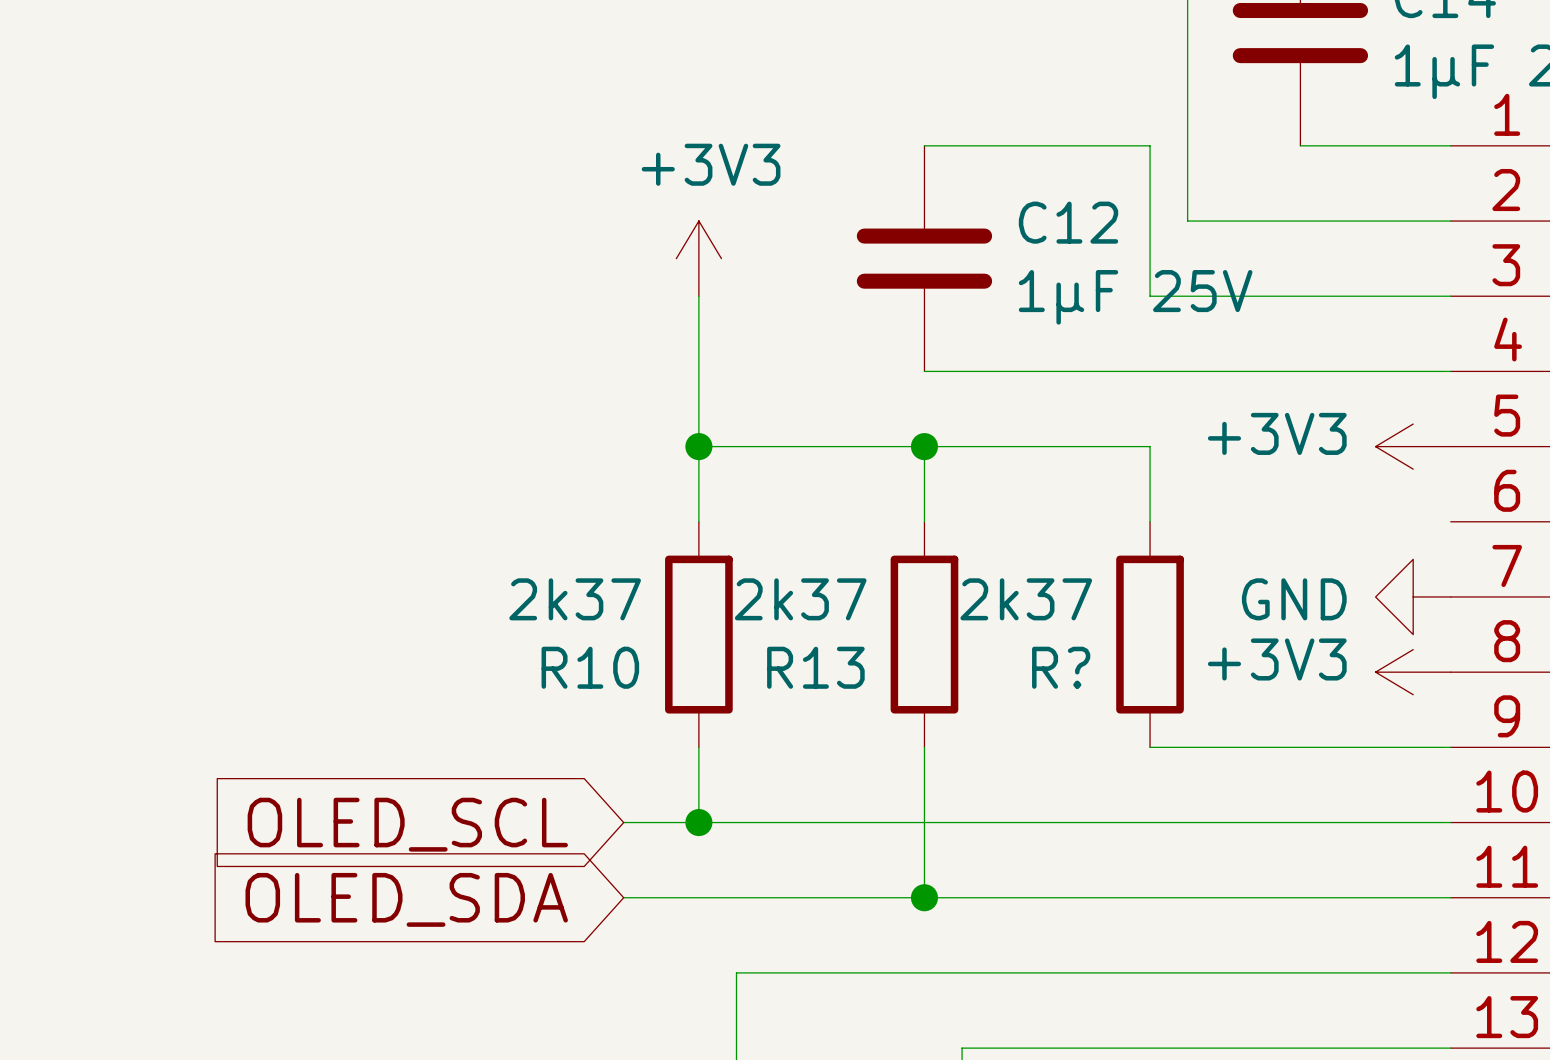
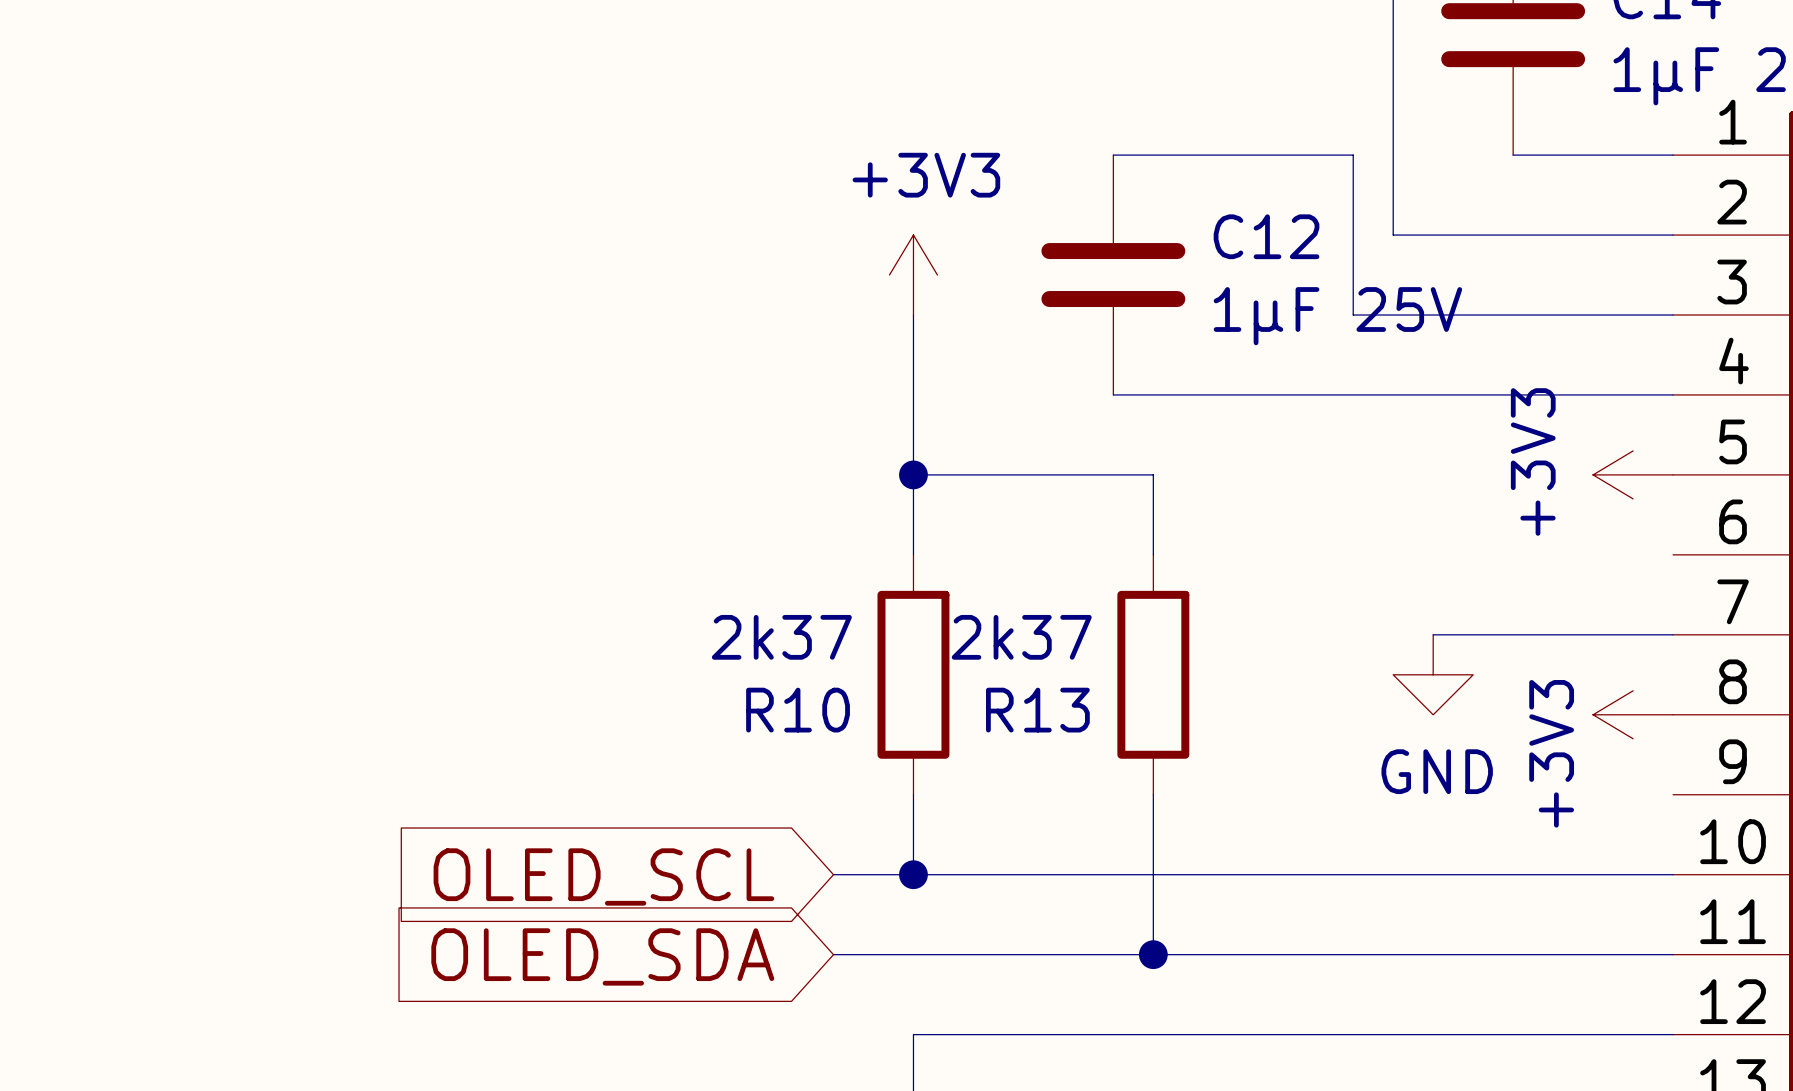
power symbol position: +3V3 (698, 258) -> +3V3 (913, 275)
wire: (698, 296) (698, 521) -> (913, 315) (913, 554)
power symbol text rotation: 0° (1277, 433) -> 90° counterclockwise (1533, 461)
wire: (698, 446) (736, 446) -> none
junction position: (698, 446) -> (913, 474)
wire: (924, 446) (924, 521) -> none
junction: (924, 446) -> none
wire: (962, 446) (1150, 446) (1150, 521) -> (1153, 474) (1153, 554)
wire: none -> (1433, 634) (1673, 634)
power symbol rotation: 0° (1413, 596) -> 90° counterclockwise (1433, 674)
power symbol position: GND (1413, 596) -> GND (1433, 674)
R10 position: (698, 634) -> (913, 674)
R13 position: (924, 634) -> (1153, 674)
R?: 2k37 (1150, 634) -> none
power symbol text rotation: 0° (1277, 659) -> 90° counterclockwise (1551, 753)
wire: (698, 747) (698, 822) -> (913, 794) (913, 874)
wire: (924, 747) (924, 897) -> (1153, 794) (1153, 954)
wire: (1150, 747) (1450, 747) -> none
wire: (623, 822) (661, 822) -> none
junction position: (698, 822) -> (913, 874)
global label position: OLED_SCL (407, 824) -> OLED_SCL (603, 876)
wire: (623, 897) (661, 897) -> none
junction position: (924, 897) -> (1153, 954)
global label position: OLED_SDA (406, 899) -> OLED_SDA (602, 956)

